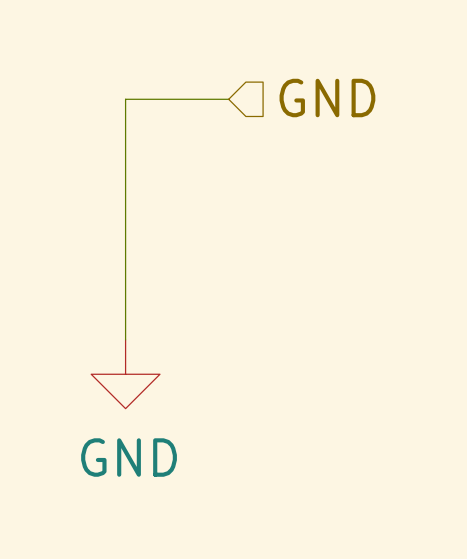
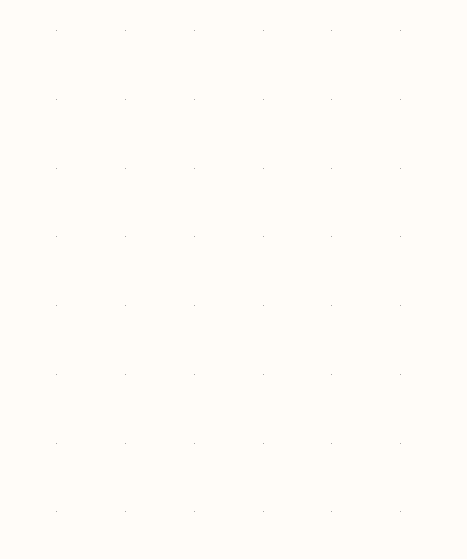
hierarchical label: GND (327, 98) -> none
wire: (228, 99) (125, 99) (125, 339) -> none
power symbol: GND (125, 374) -> none

